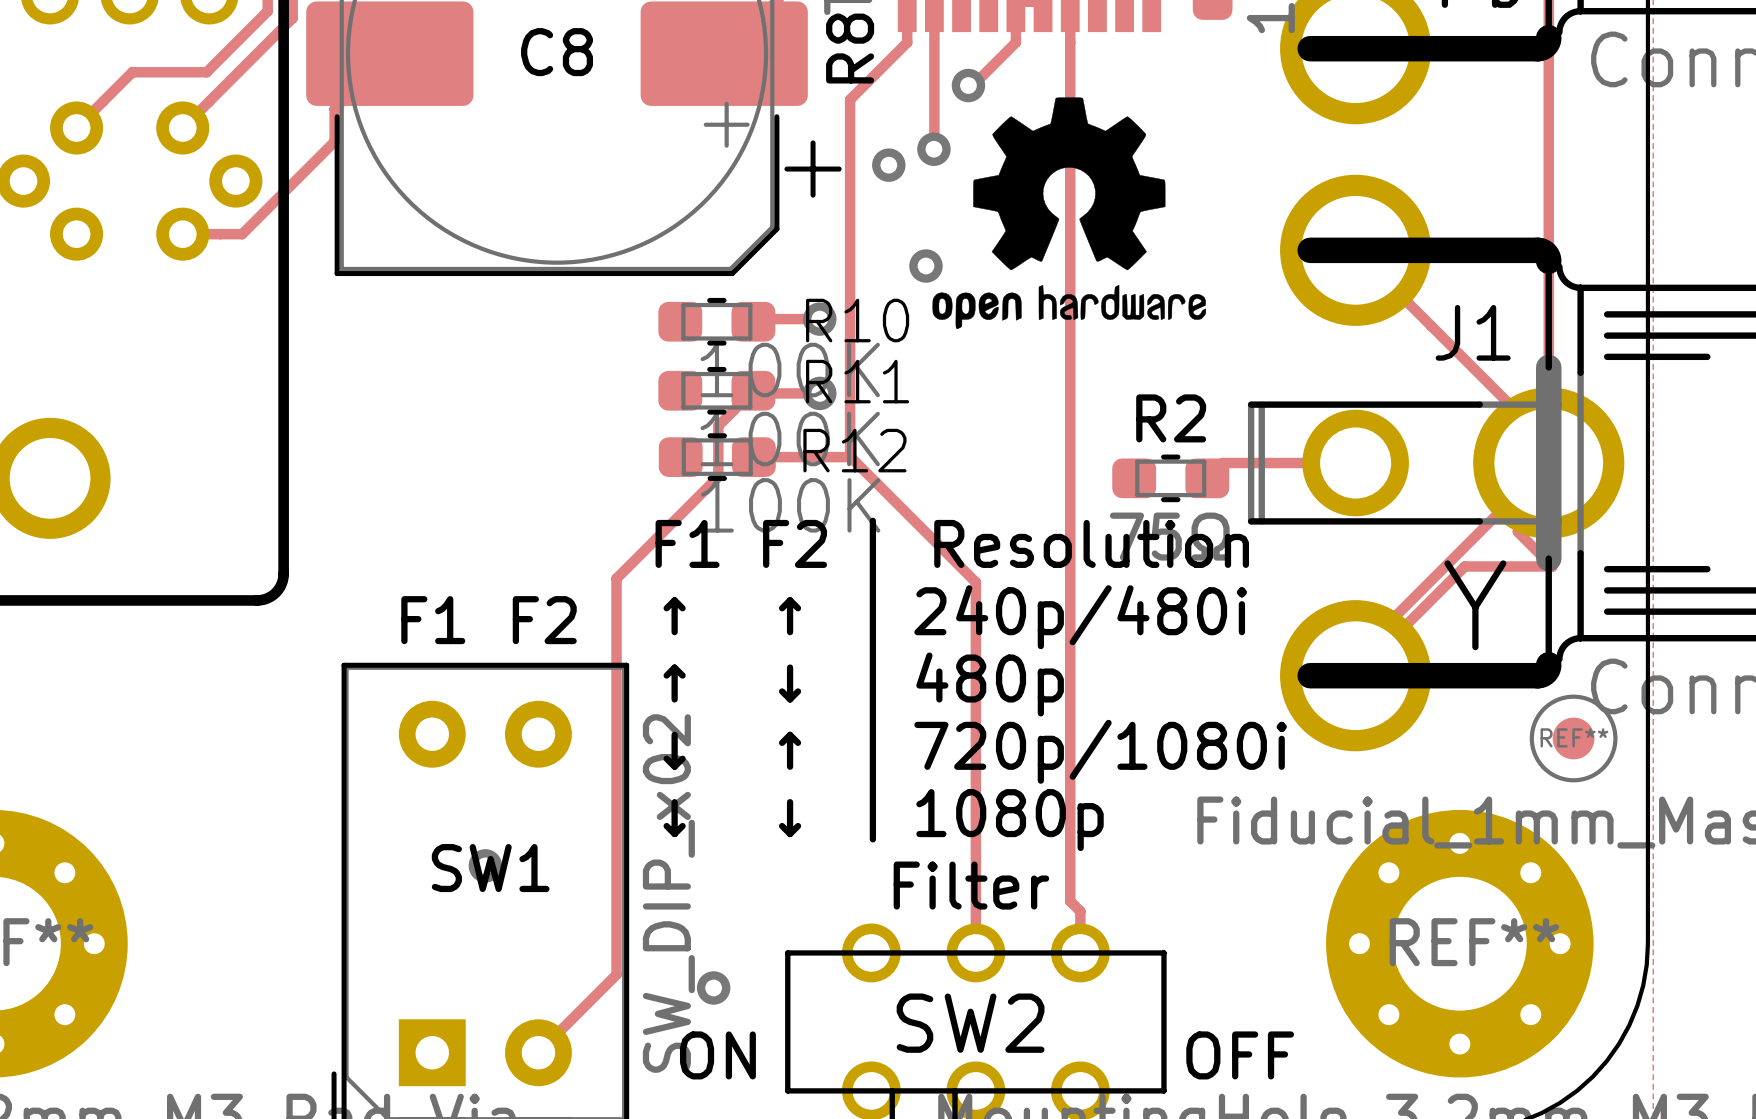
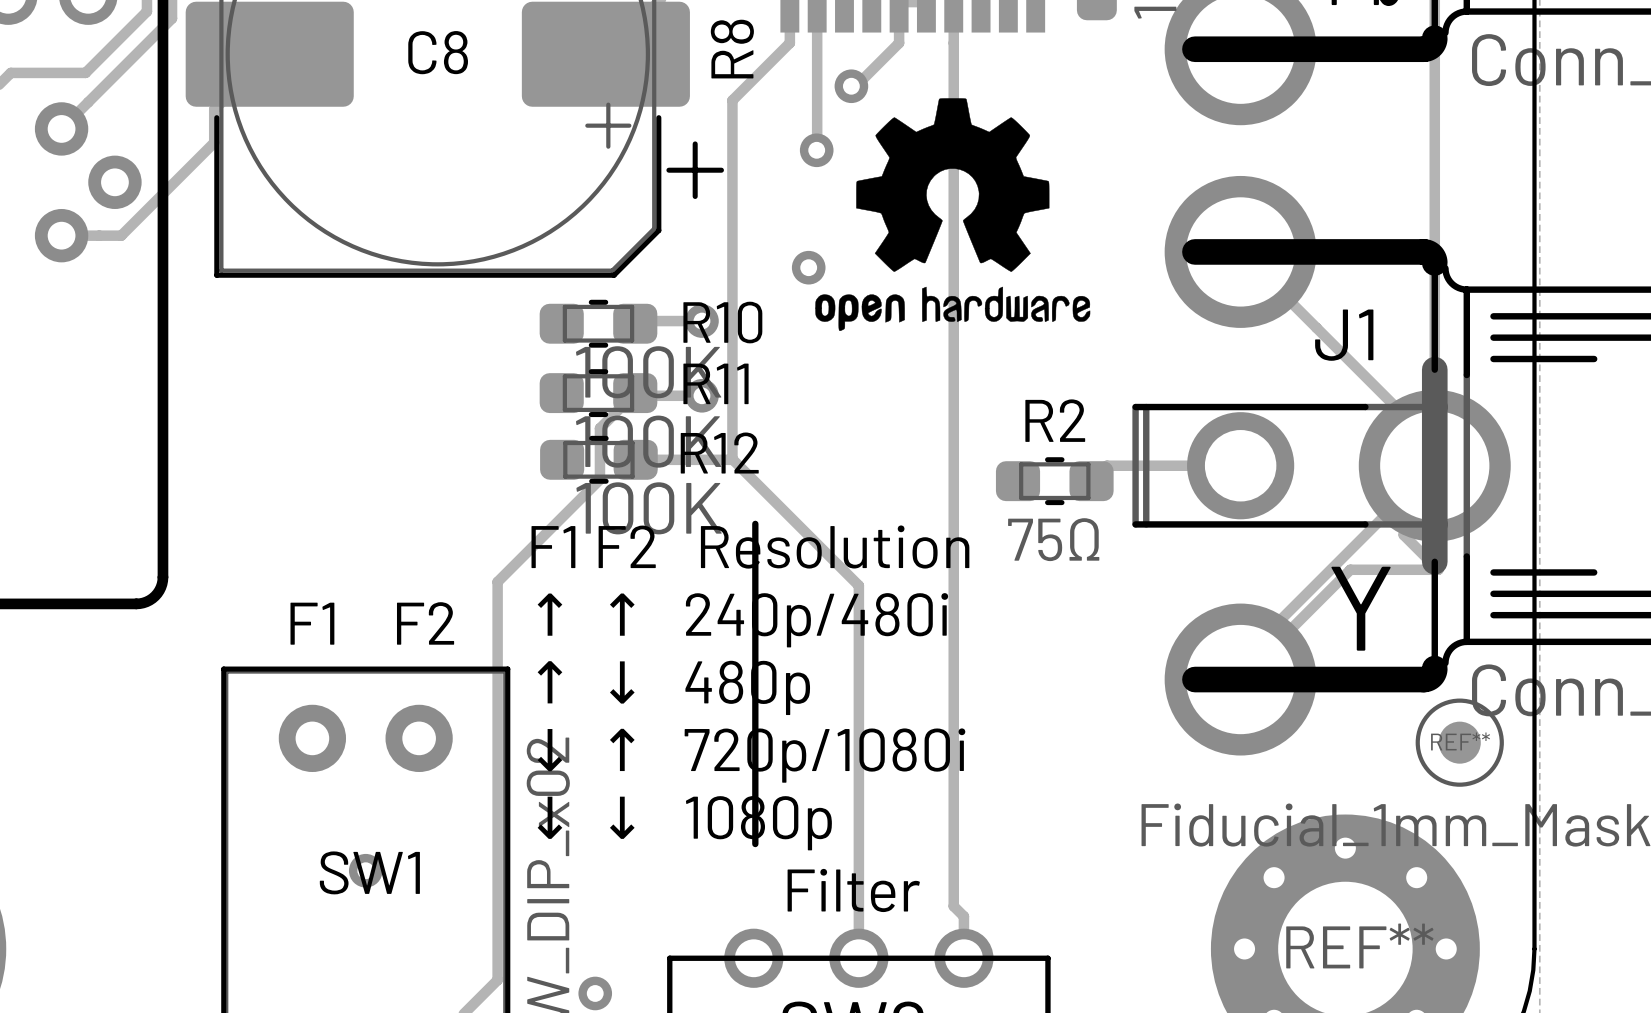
via: (888, 165) -> none

